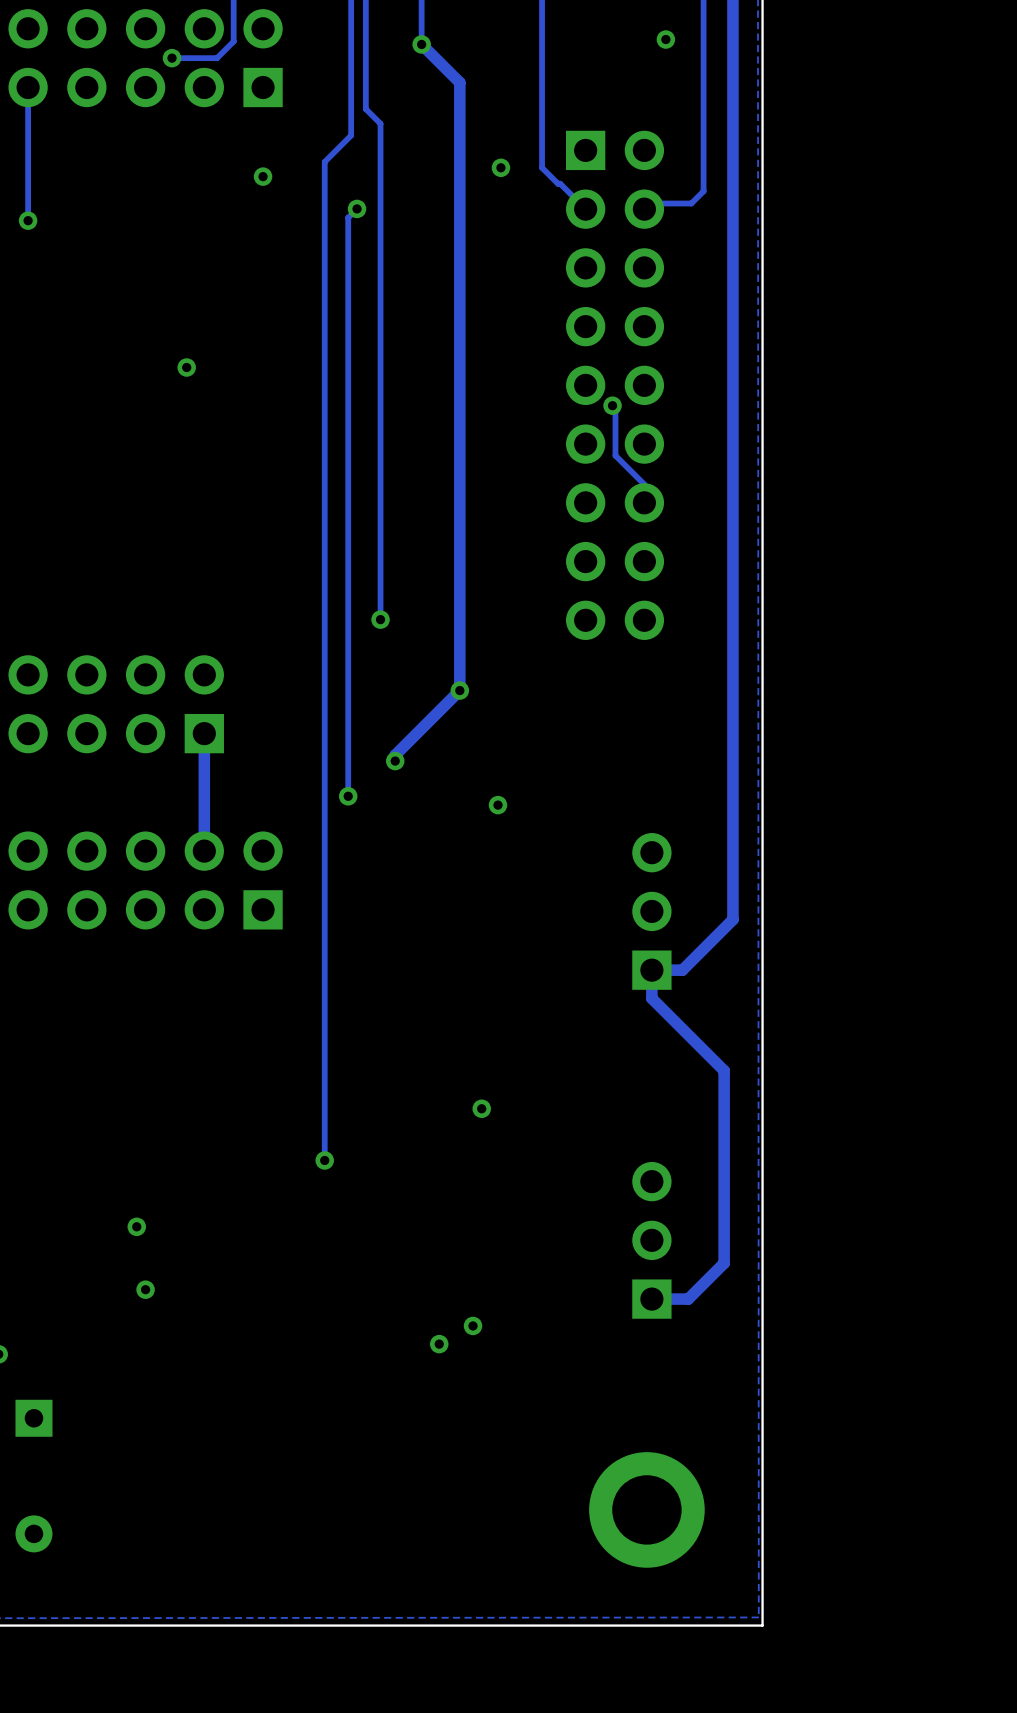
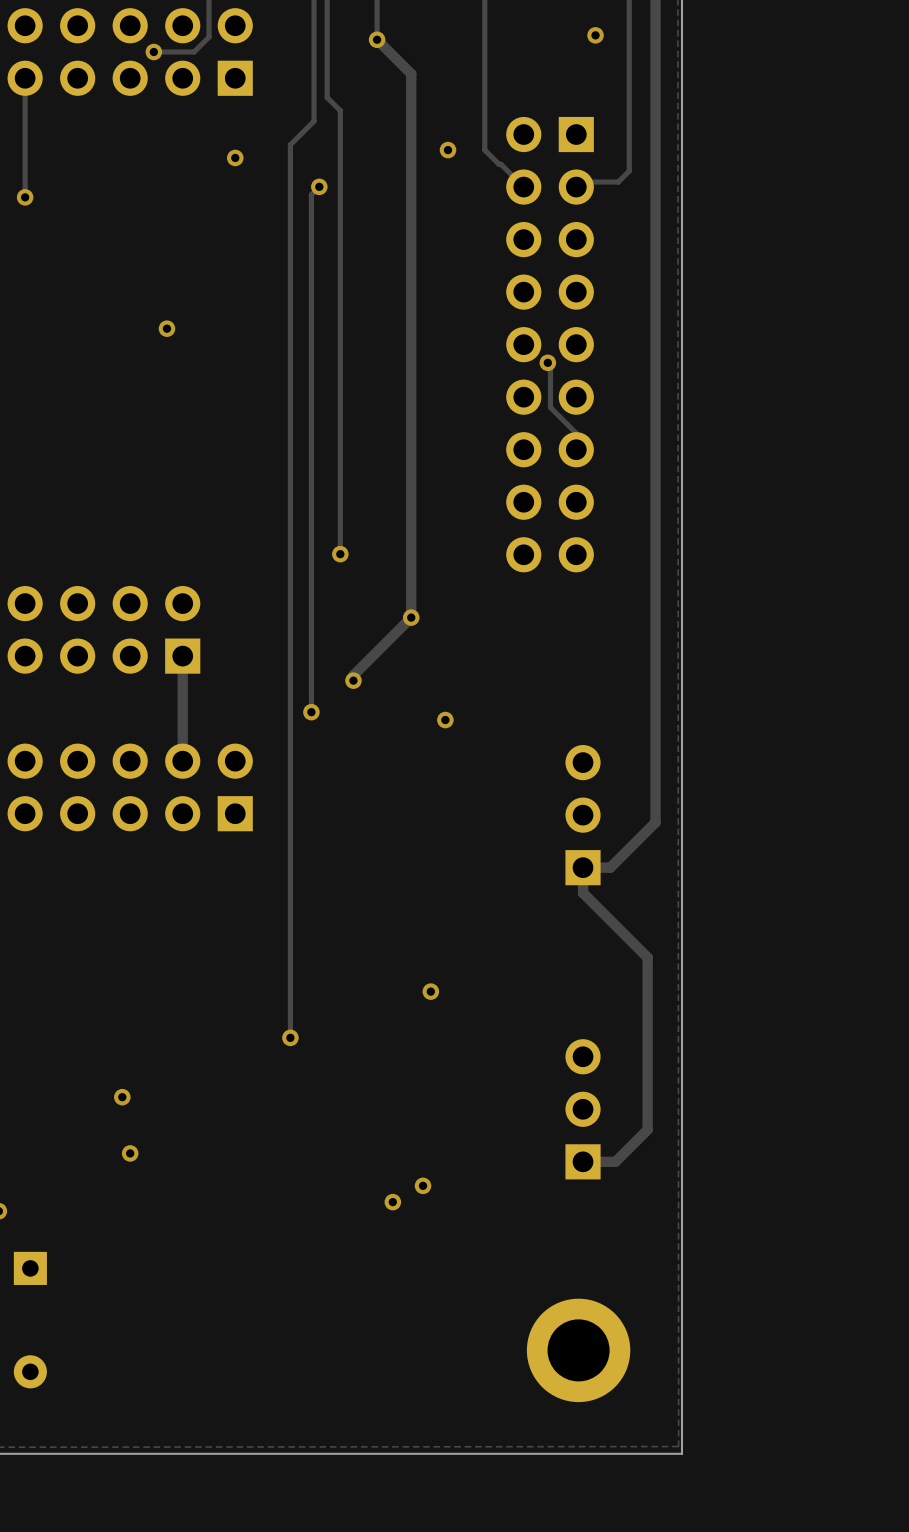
part footprint: [565, 130, 665, 640] -> [506, 116, 594, 573]

